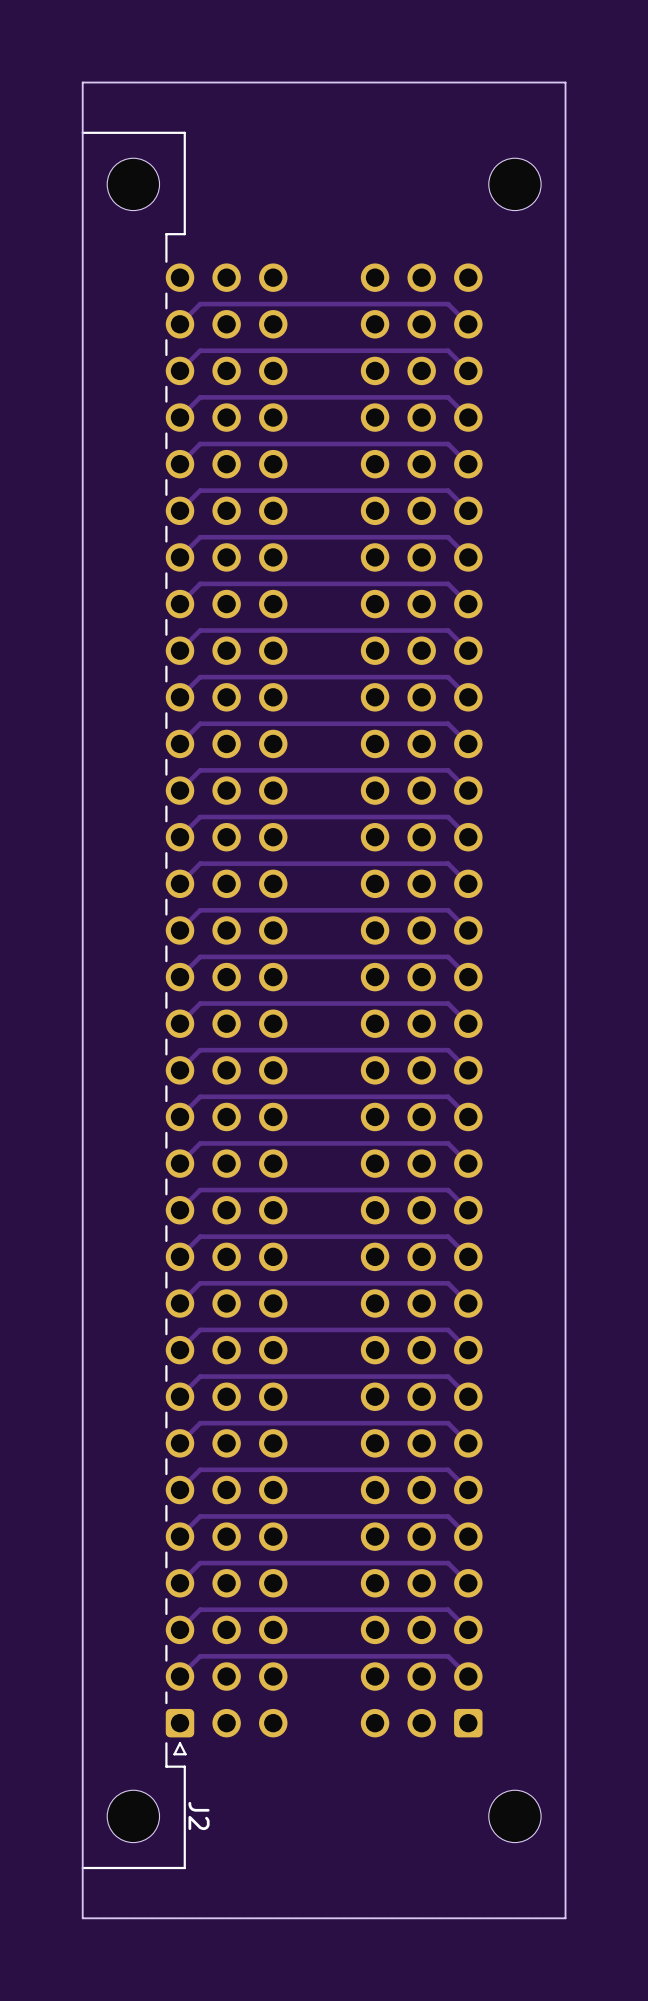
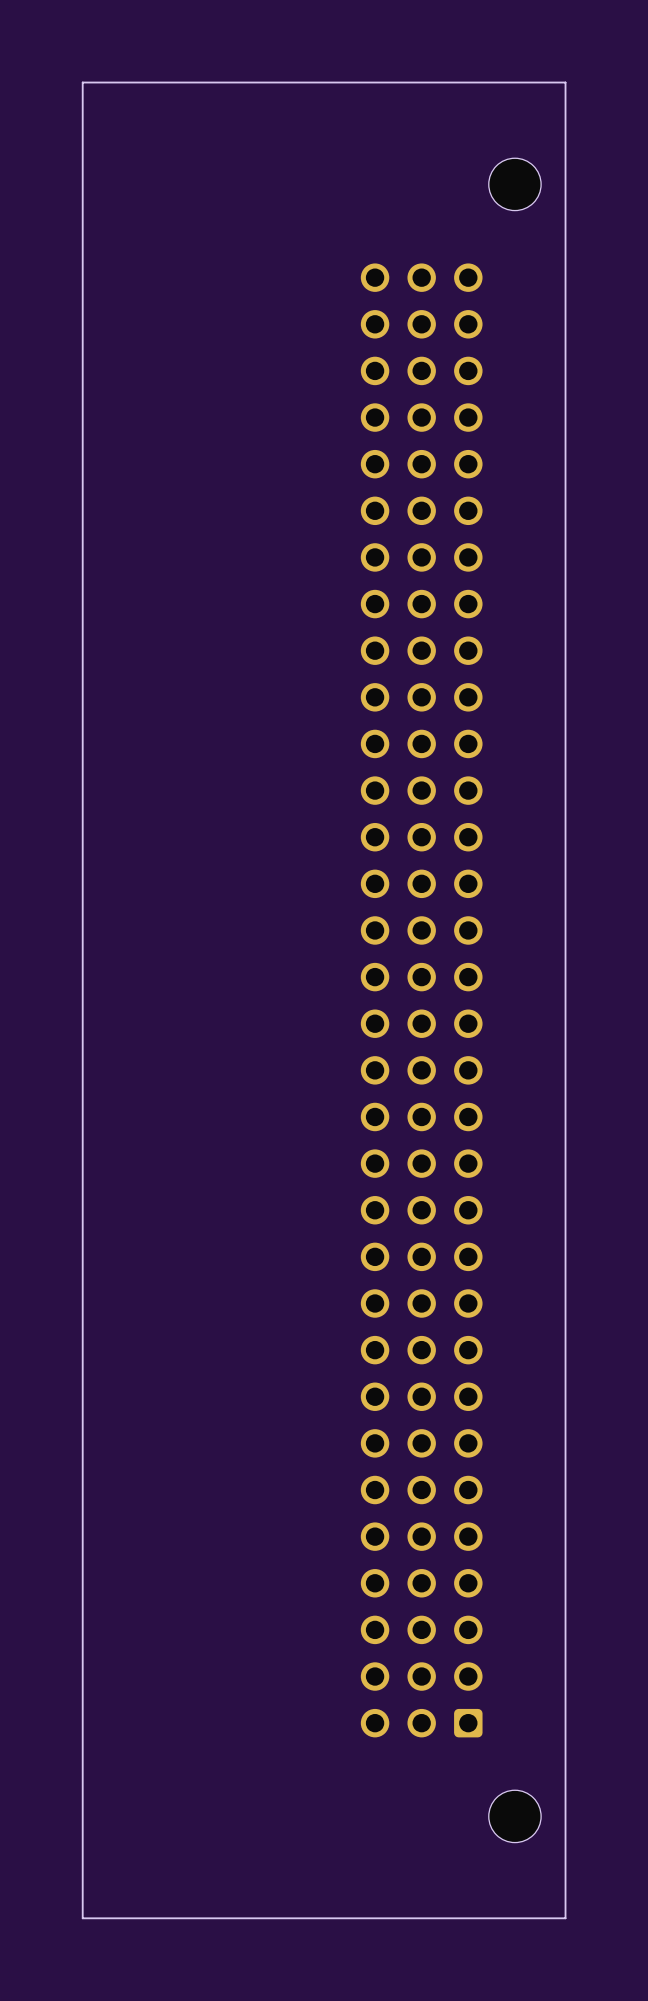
track: (468, 324) (448, 304) (200, 304) (180, 324) -> none
track: (468, 370) (448, 350) (200, 350) (180, 370) -> none
track: (468, 417) (448, 397) (200, 397) (180, 417) -> none
track: (468, 464) (448, 443) (200, 443) (180, 464) -> none
track: (468, 510) (448, 490) (200, 490) (180, 510) -> none
track: (468, 557) (448, 537) (200, 537) (180, 557) -> none
track: (468, 604) (448, 583) (200, 583) (180, 604) -> none
track: (468, 650) (448, 630) (200, 630) (180, 650) -> none
track: (468, 697) (448, 677) (200, 677) (180, 697) -> none
track: (468, 743) (448, 723) (200, 723) (180, 743) -> none
track: (468, 790) (448, 770) (200, 770) (180, 790) -> none
track: (468, 837) (448, 817) (200, 817) (180, 837) -> none
track: (468, 883) (448, 863) (200, 863) (180, 883) -> none
track: (468, 930) (448, 910) (200, 910) (180, 930) -> none
track: (468, 977) (448, 956) (200, 956) (180, 977) -> none
J2: (184, 1000) -> none
track: (468, 1023) (448, 1003) (200, 1003) (180, 1023) -> none
track: (468, 1070) (448, 1050) (200, 1050) (180, 1070) -> none
track: (468, 1116) (448, 1096) (200, 1096) (180, 1116) -> none
track: (468, 1163) (448, 1143) (200, 1143) (180, 1163) -> none
track: (468, 1210) (448, 1190) (200, 1190) (180, 1210) -> none
track: (468, 1256) (448, 1236) (200, 1236) (180, 1256) -> none
track: (468, 1303) (448, 1283) (200, 1283) (180, 1303) -> none
track: (468, 1350) (448, 1329) (200, 1329) (180, 1350) -> none
track: (468, 1396) (448, 1376) (200, 1376) (180, 1396) -> none
track: (468, 1443) (448, 1423) (200, 1423) (180, 1443) -> none
track: (468, 1490) (448, 1469) (200, 1469) (180, 1490) -> none
track: (468, 1536) (448, 1516) (200, 1516) (180, 1536) -> none
track: (468, 1583) (448, 1563) (200, 1563) (180, 1583) -> none
track: (468, 1629) (448, 1609) (200, 1609) (180, 1629) -> none
track: (468, 1676) (448, 1656) (200, 1656) (180, 1676) -> none

